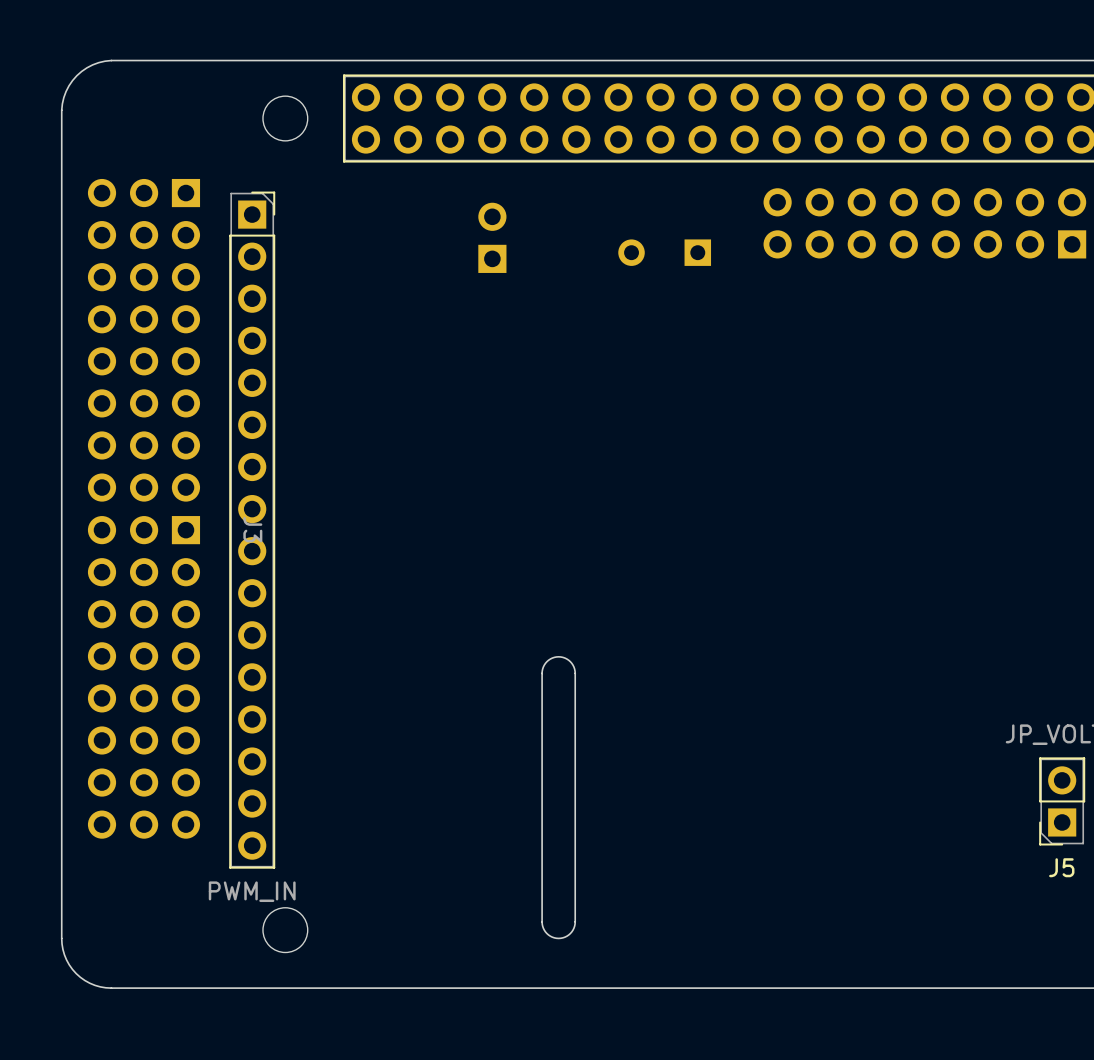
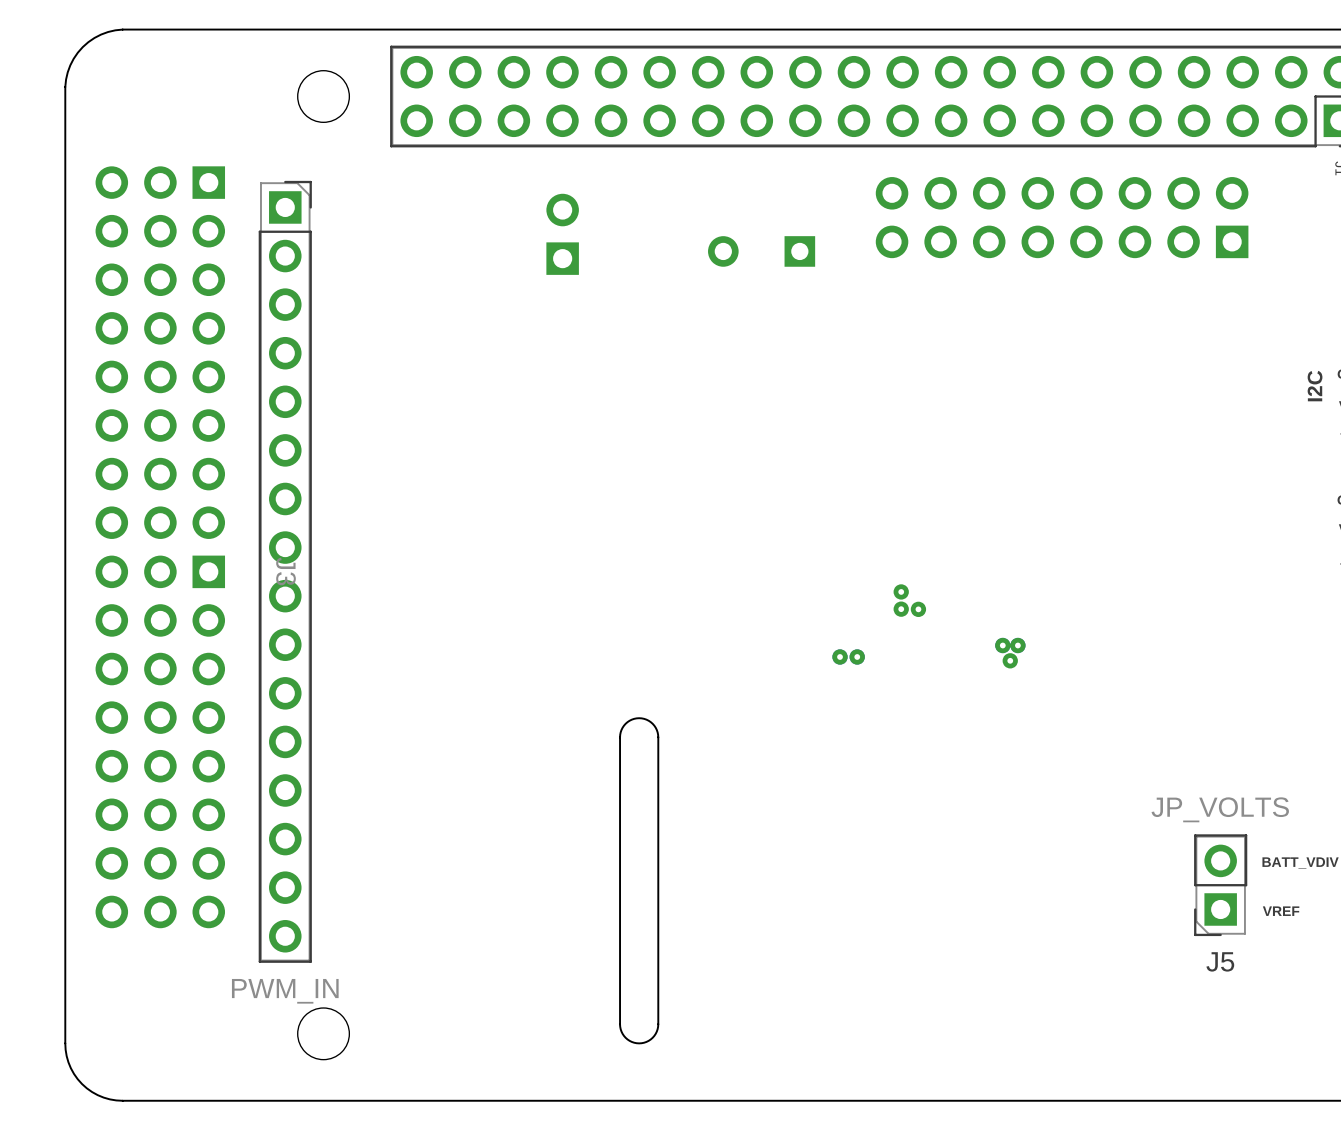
part: none -> (901, 591)
part: none -> (901, 609)
part: none -> (918, 609)
part: none -> (1002, 645)
part: none -> (1017, 645)
part: none -> (840, 656)
part: none -> (857, 656)
part: none -> (1010, 660)

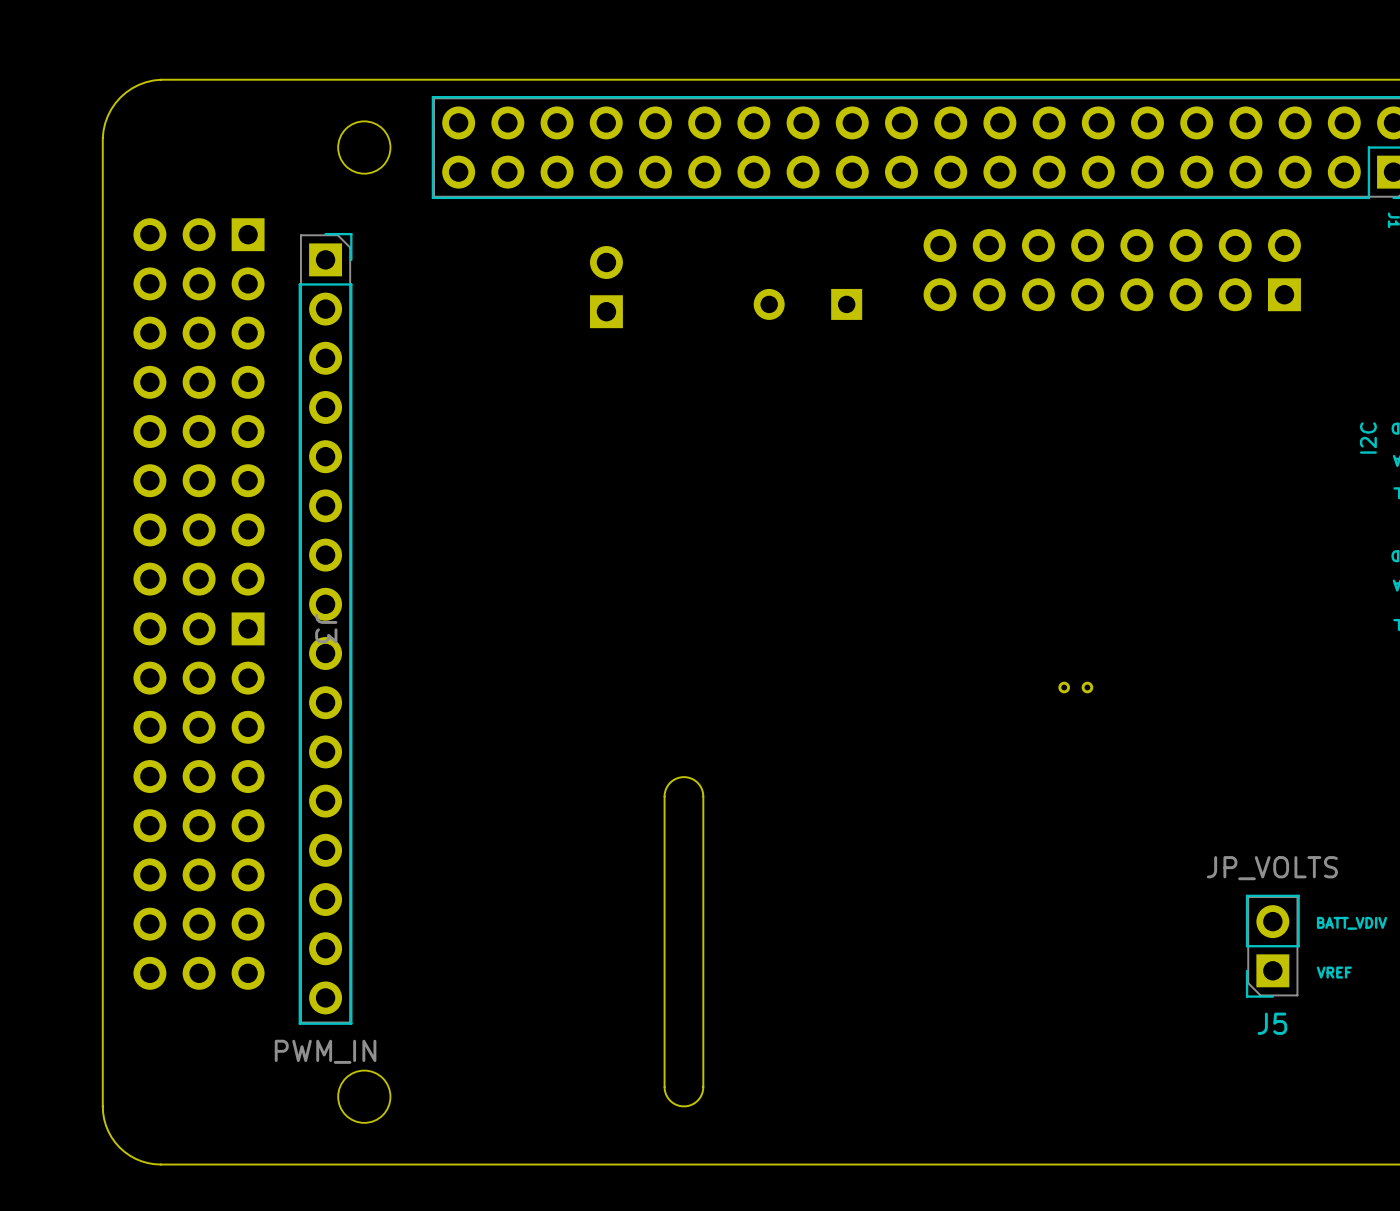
part: (901, 591) -> none
part: (901, 609) -> none
part: (918, 609) -> none
part: none -> (1075, 687)
part: (1002, 645) -> none
part: (1017, 645) -> none
part: (840, 656) -> none
part: (857, 656) -> none
part: (1010, 660) -> none

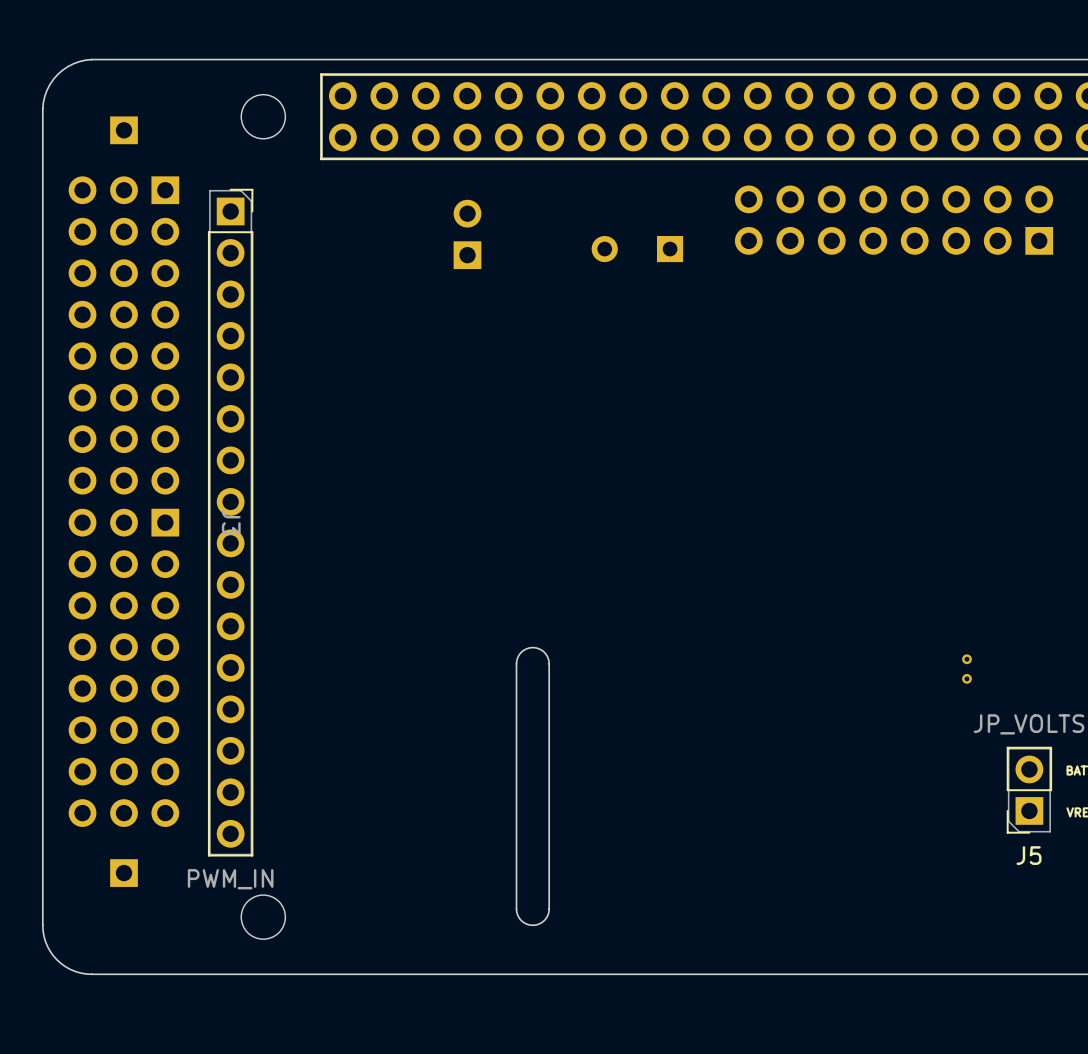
part: none -> (124, 130)
part rotation: 0° (1075, 687) -> 90° clockwise (966, 669)
part position: (1075, 687) -> (966, 669)
part: none -> (124, 873)

